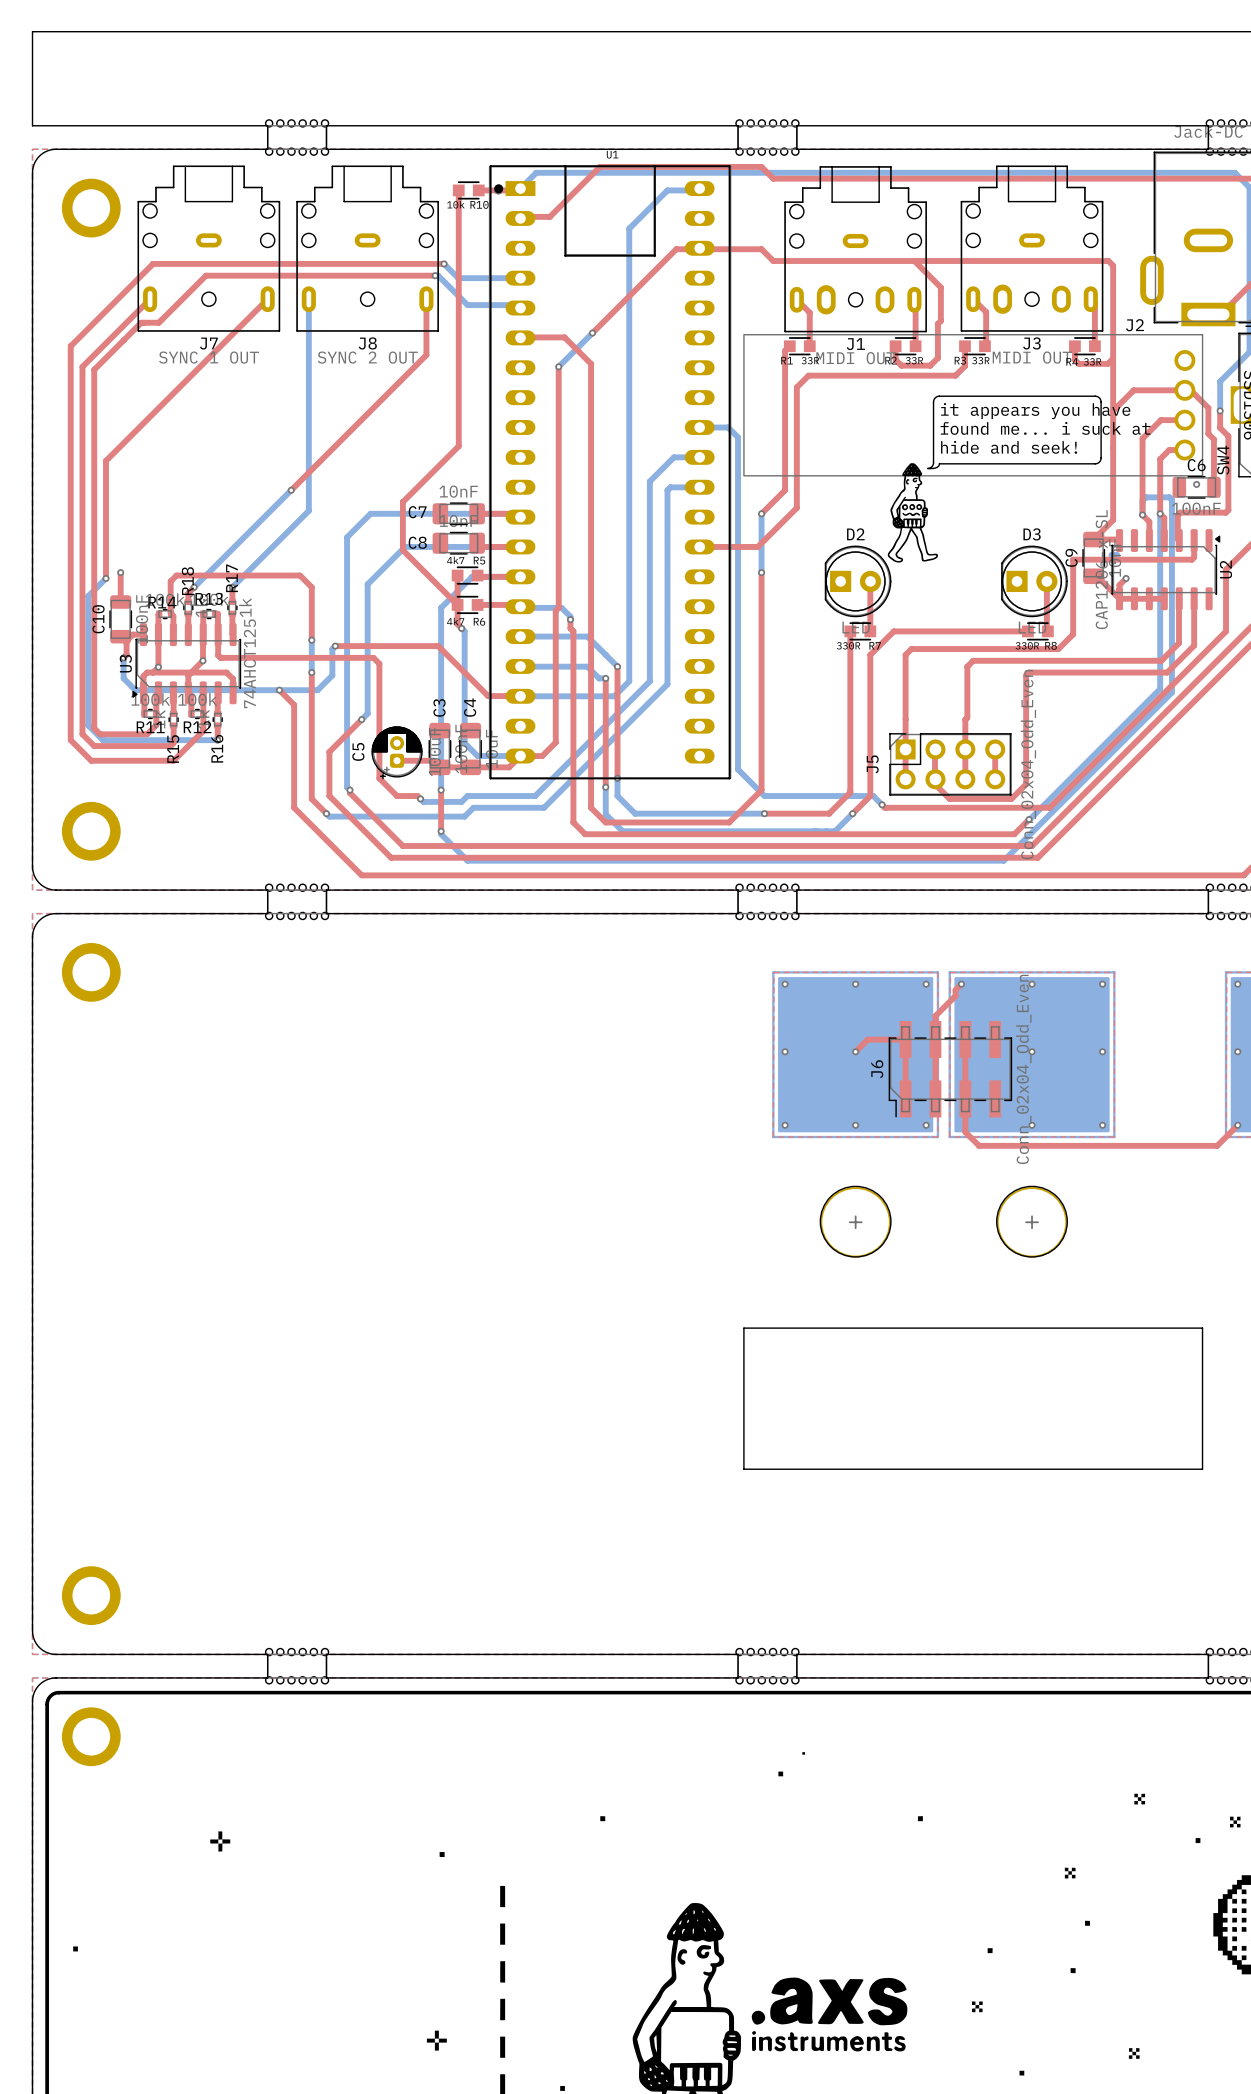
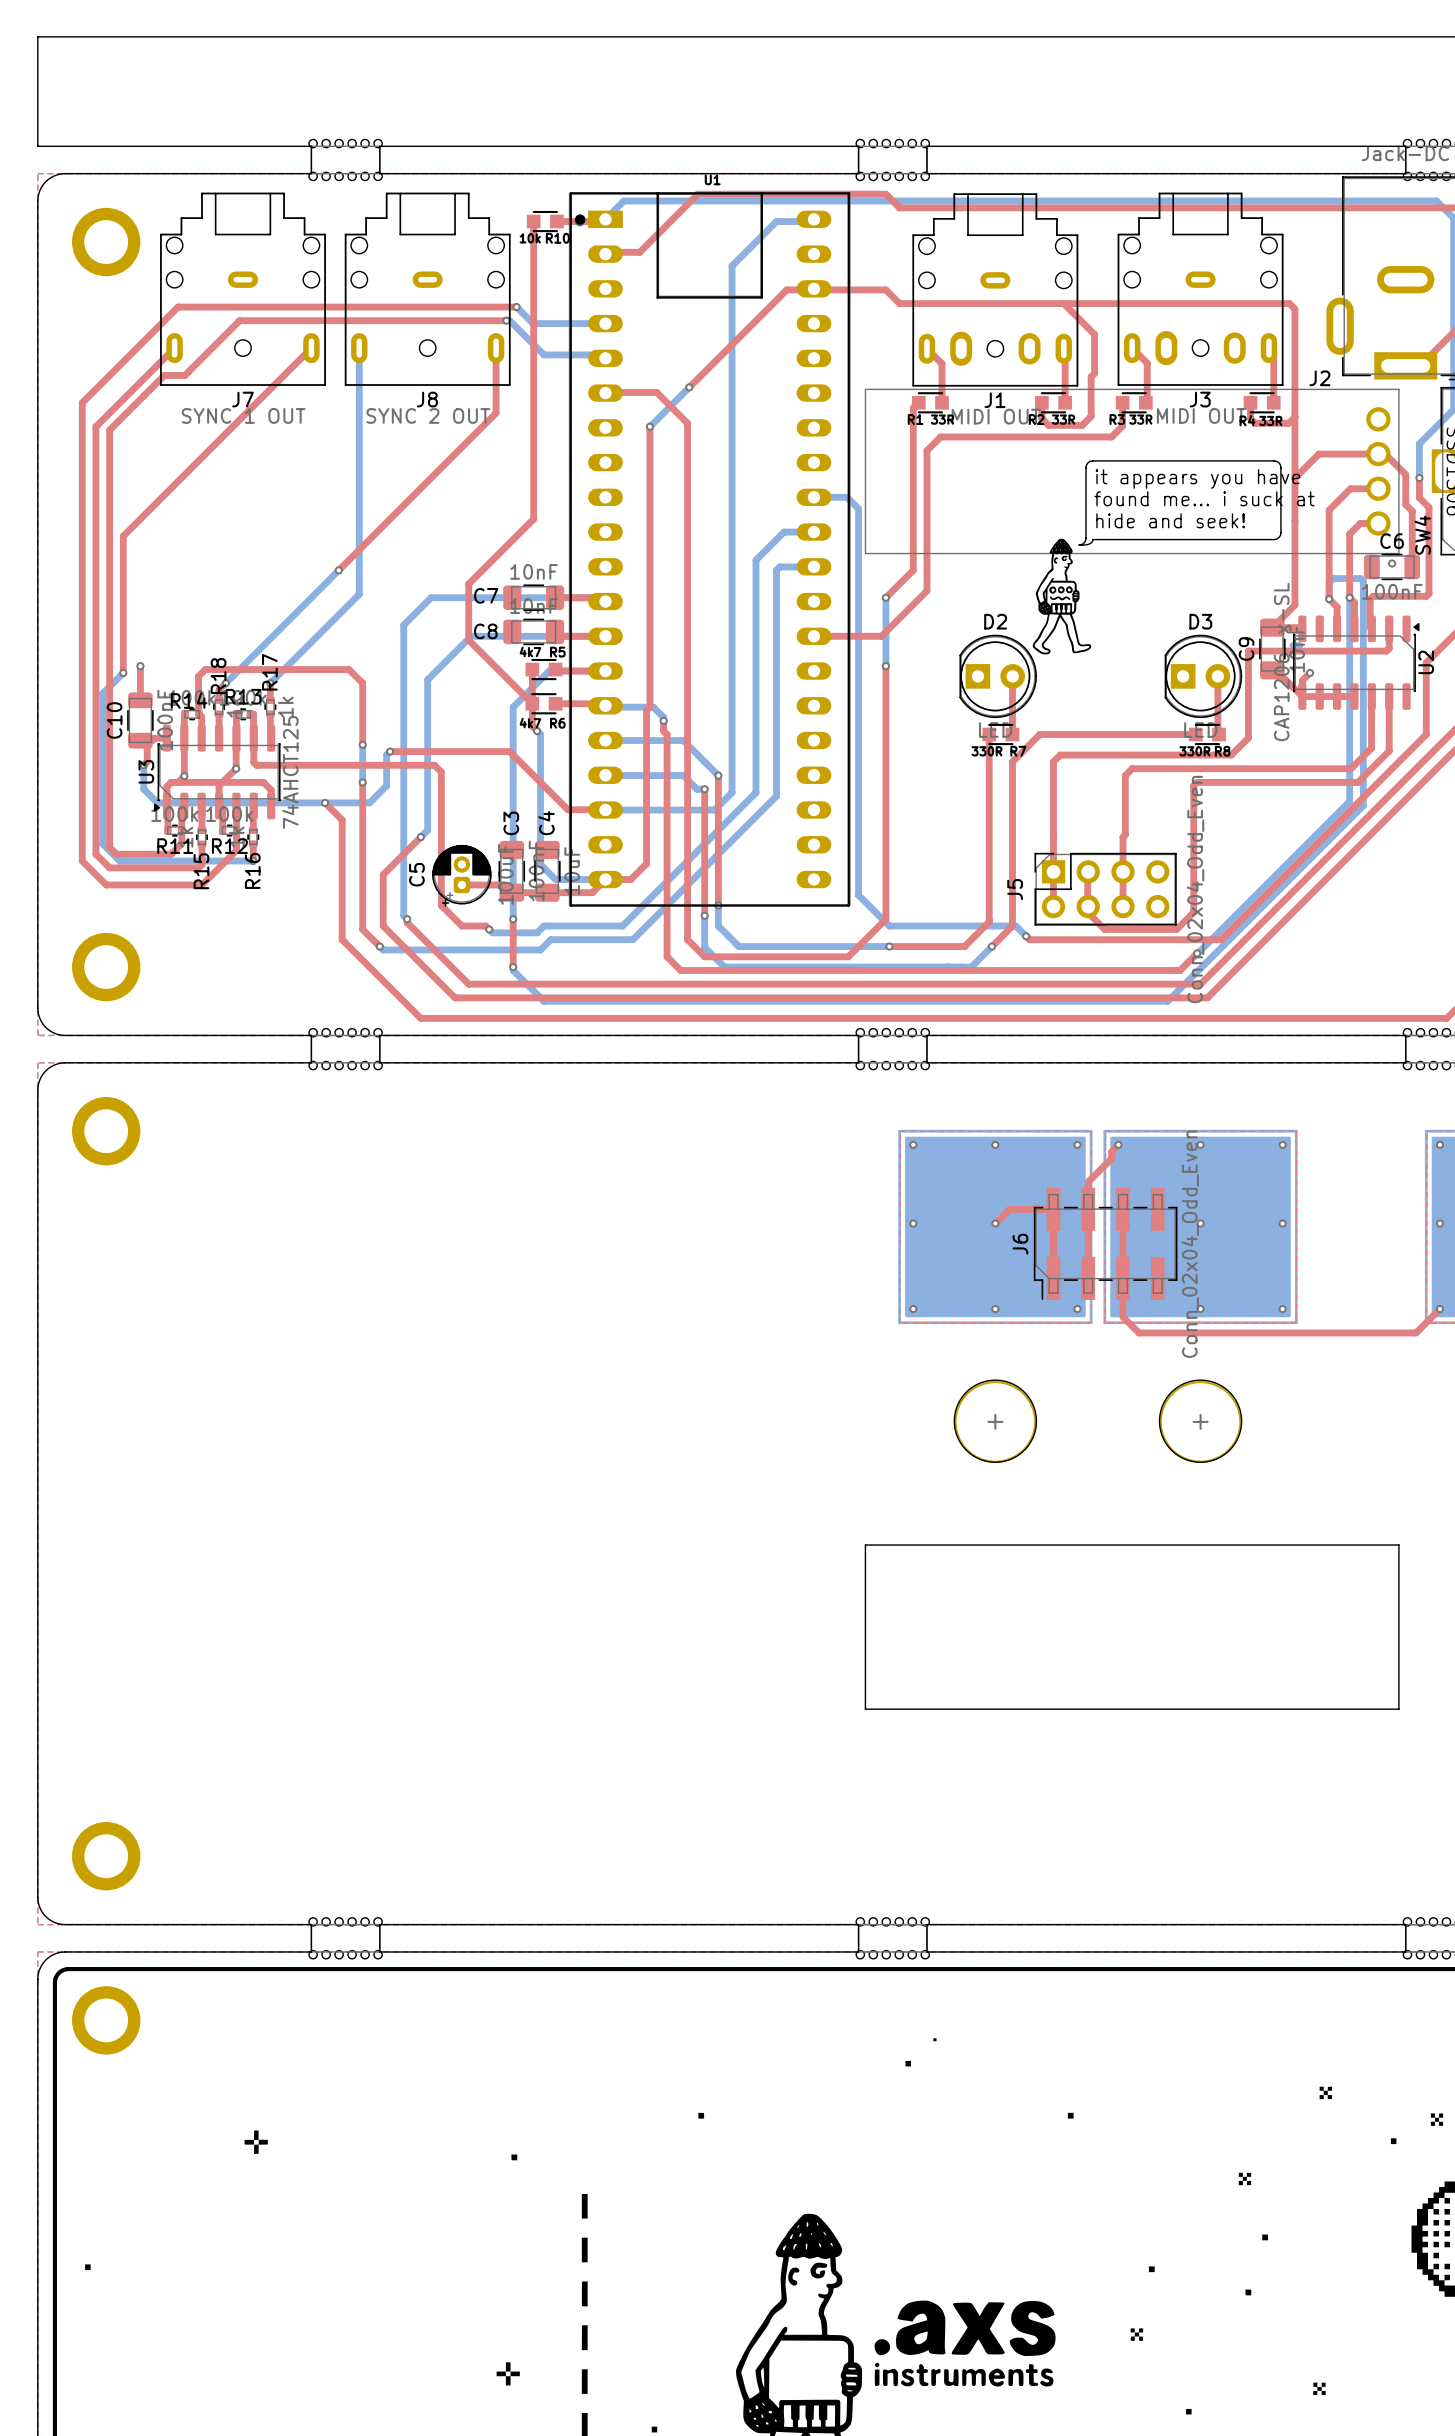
top track: (995, 756) (995, 779) -> none

